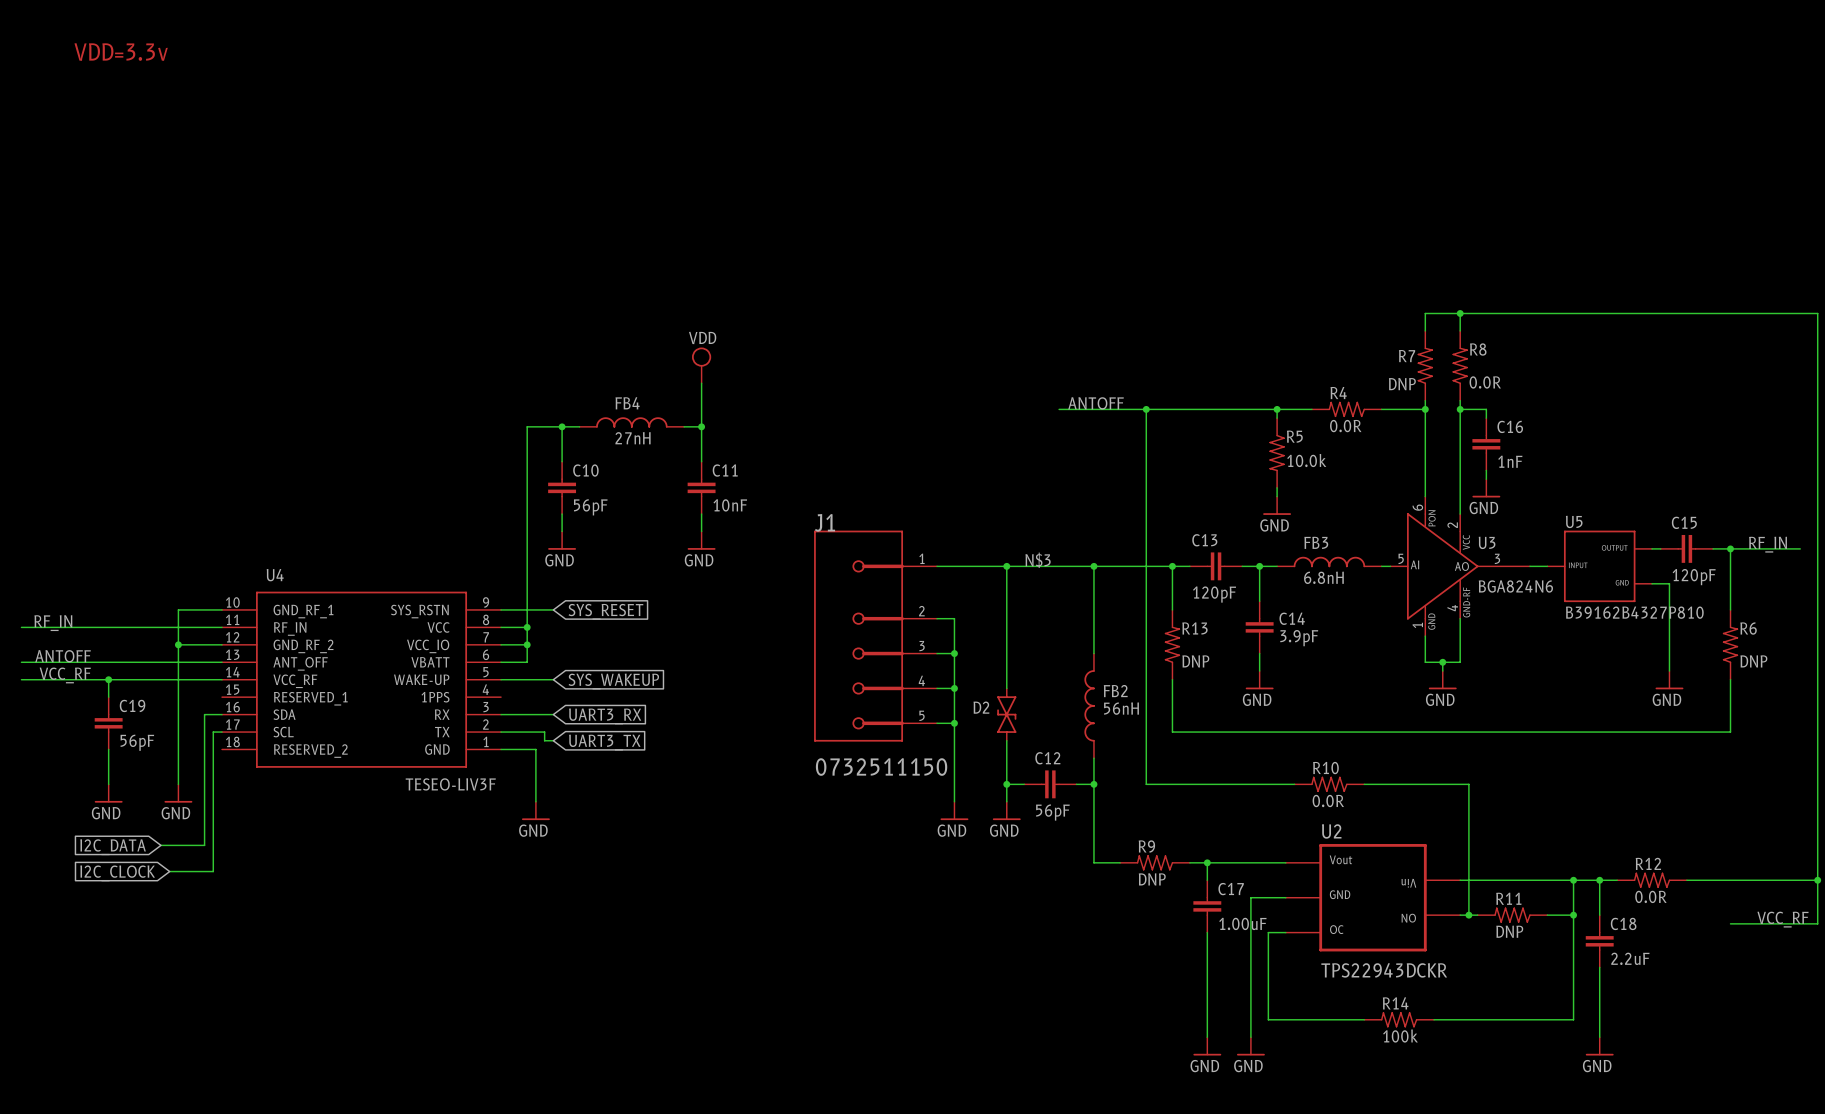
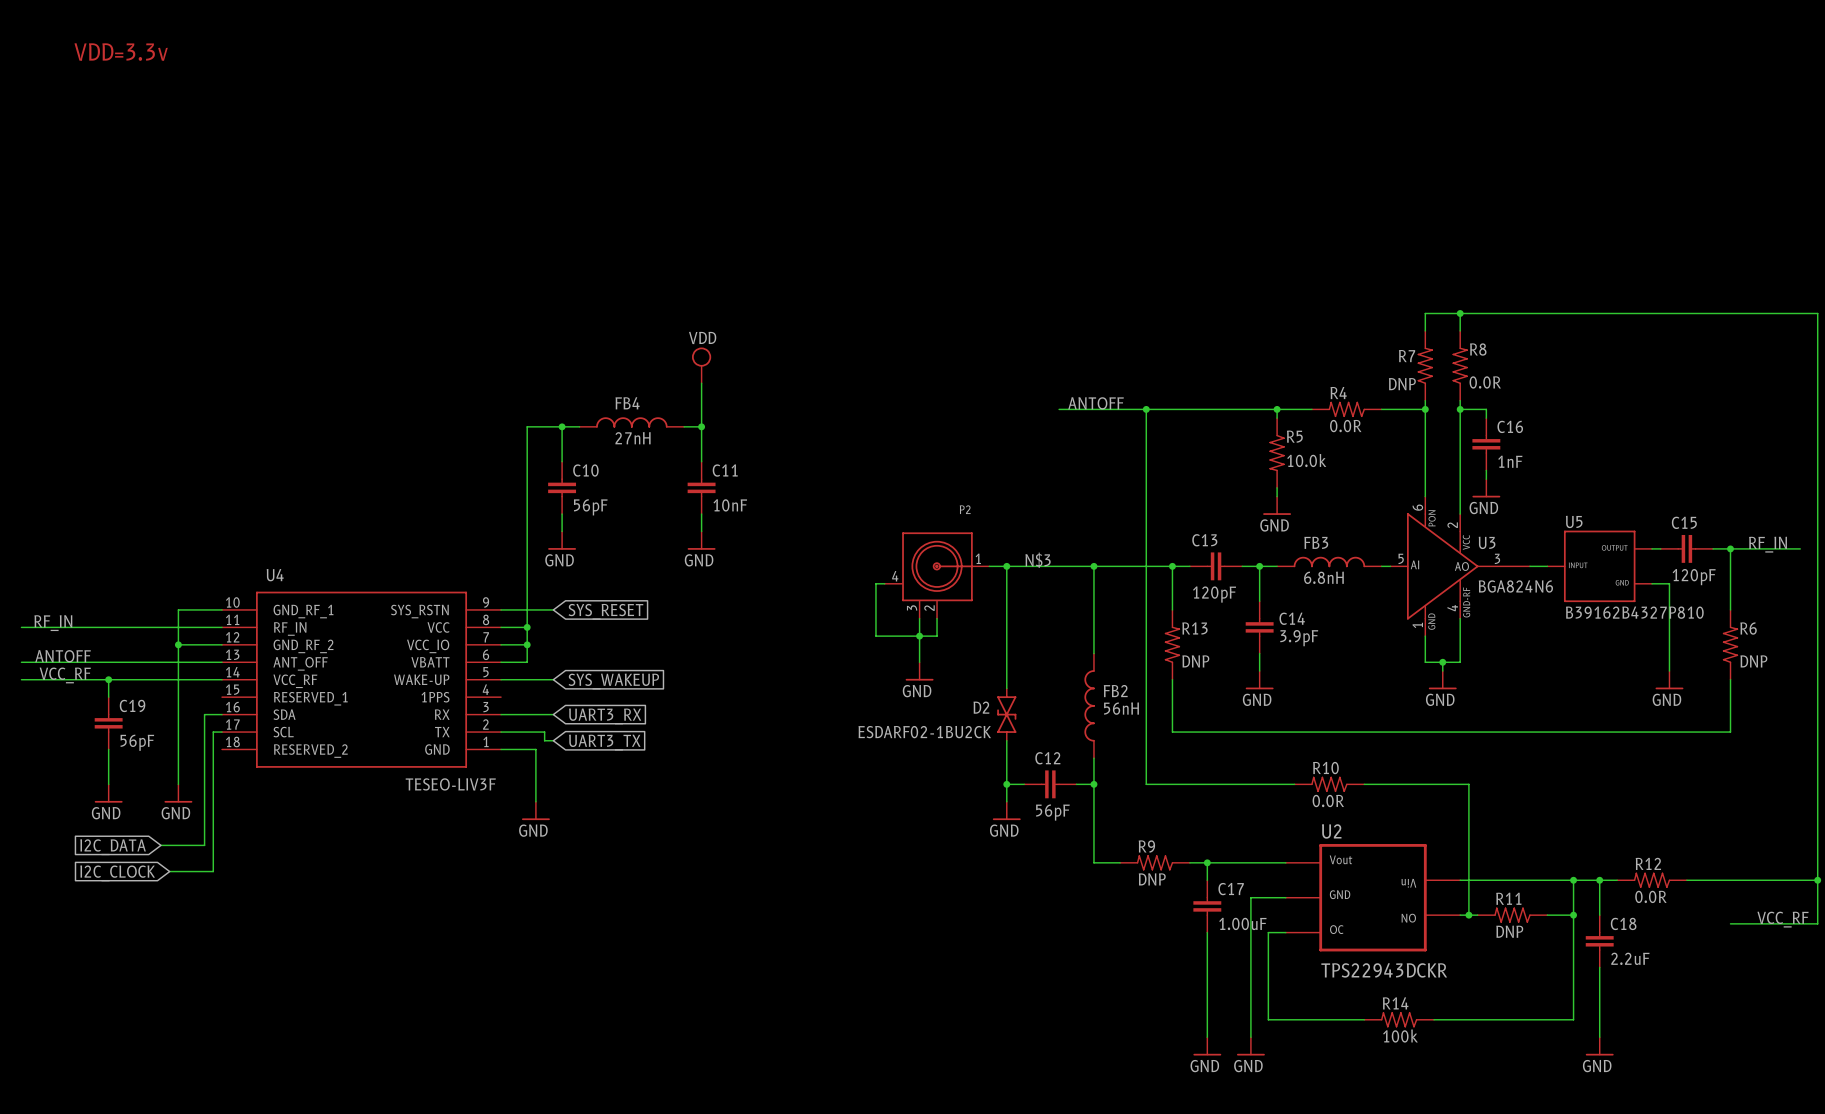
P2: none -> (937, 575)
wire: none -> (919, 618) (919, 662)
wire: (937, 618) (954, 618) (954, 801) -> (937, 618) (937, 636) (875, 636) (875, 583) (884, 583)
J1: (875, 636) -> none
junction: none -> (919, 636)
wire: (937, 653) (954, 653) -> none
junction: (954, 653) -> none
wire: (937, 688) (954, 688) -> none
junction: (954, 688) -> none
wire: (937, 723) (954, 723) -> none
junction: (954, 723) -> none
D2 value: none -> ESDARF02-1BU2CK (924, 732)
power symbol position: GND (954, 810) -> GND (919, 671)

